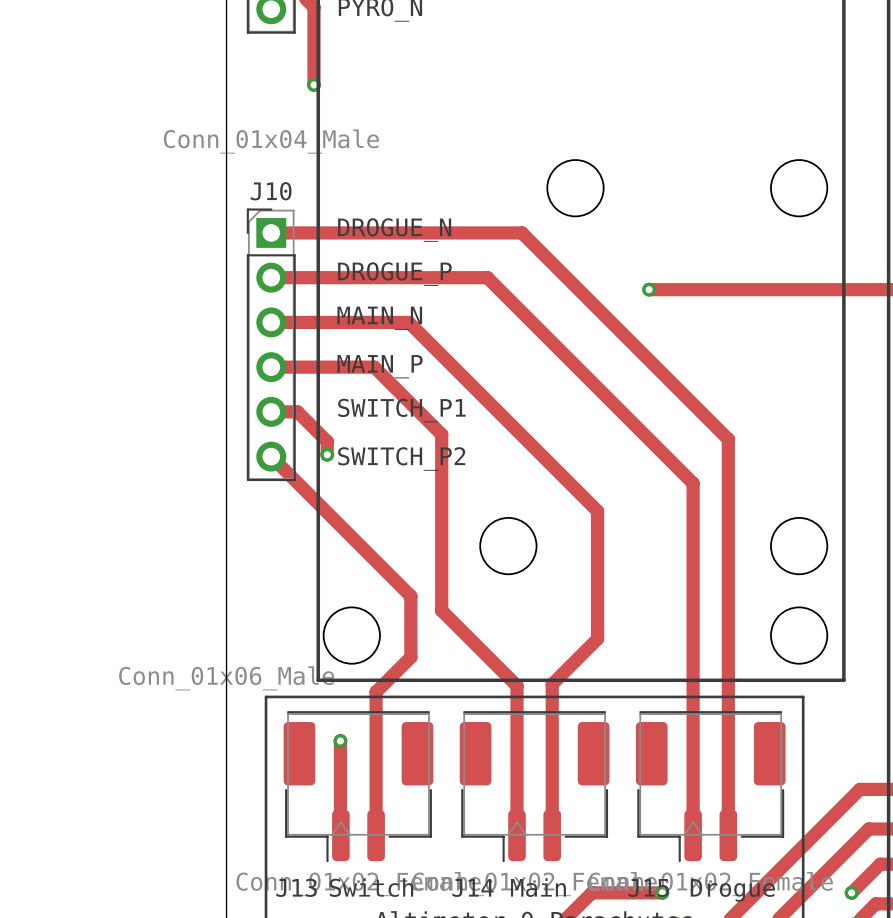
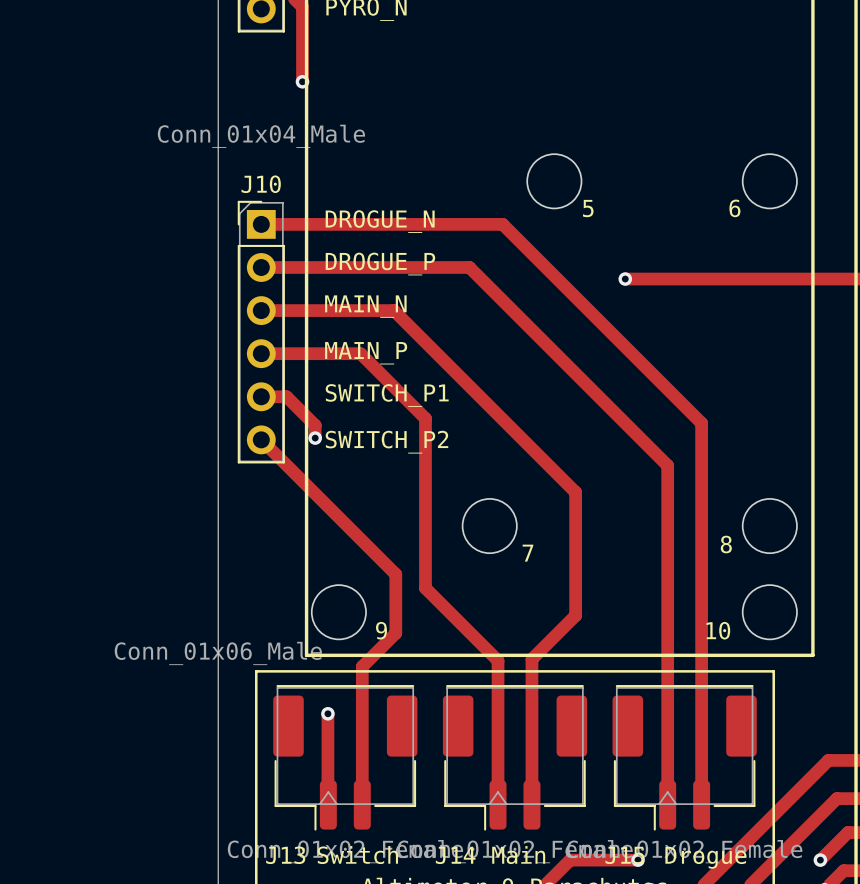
text: none -> 5 (588, 208)
text: none -> 6 (734, 208)
text: none -> 8 (726, 544)
text: none -> 7 (527, 553)
text: none -> 9 (381, 630)
text: none -> 10 (718, 630)

